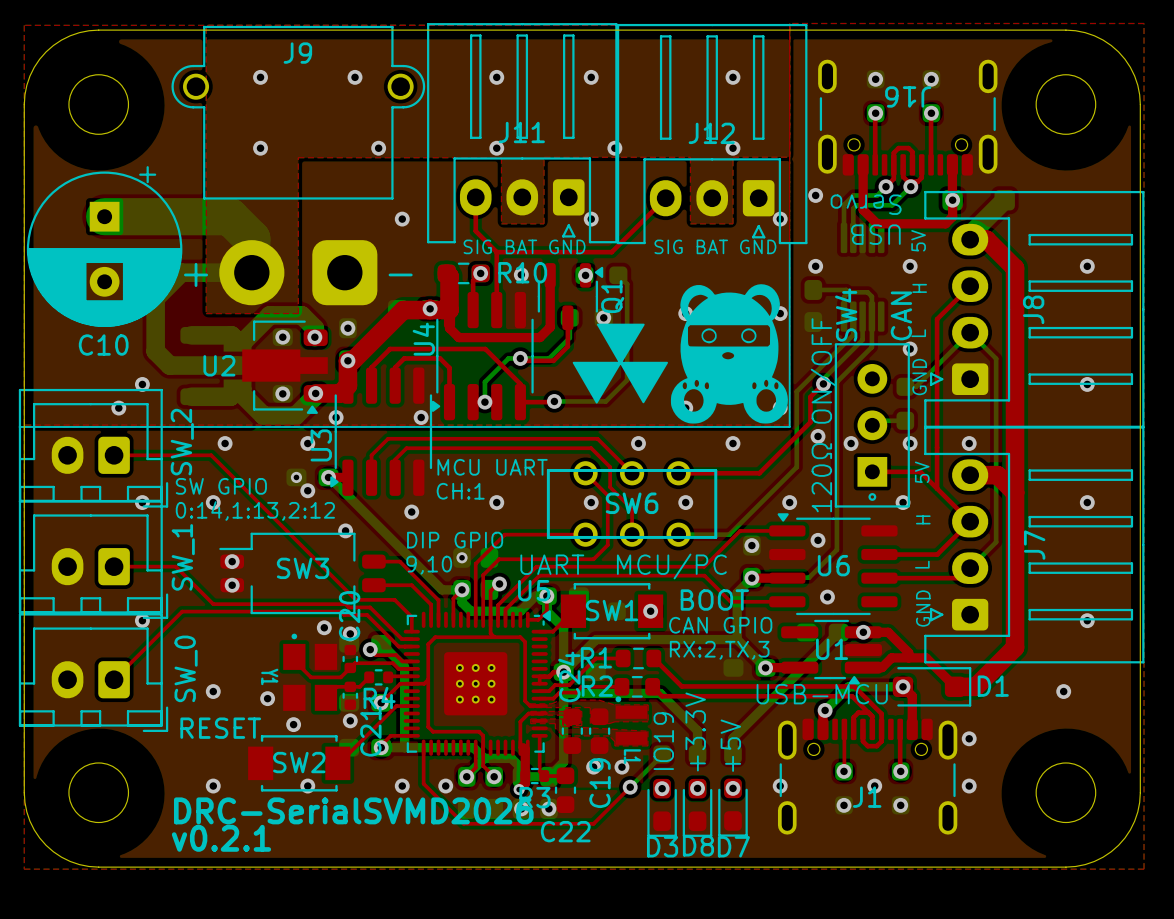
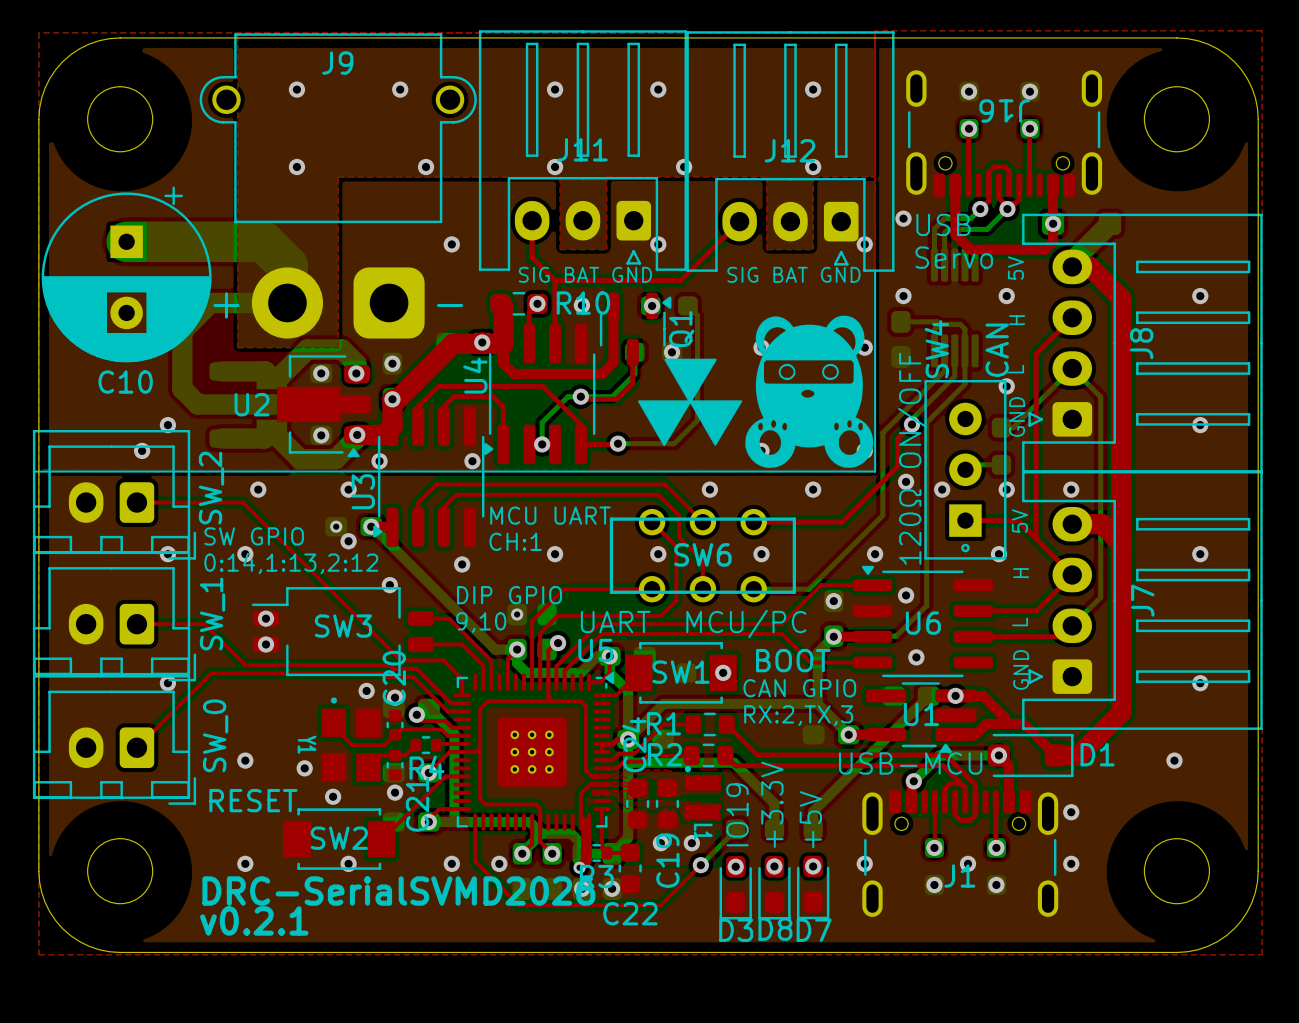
text rotation: 0° (866, 204) -> 180° (954, 257)
text rotation: 0° (875, 234) -> 180° (943, 224)

